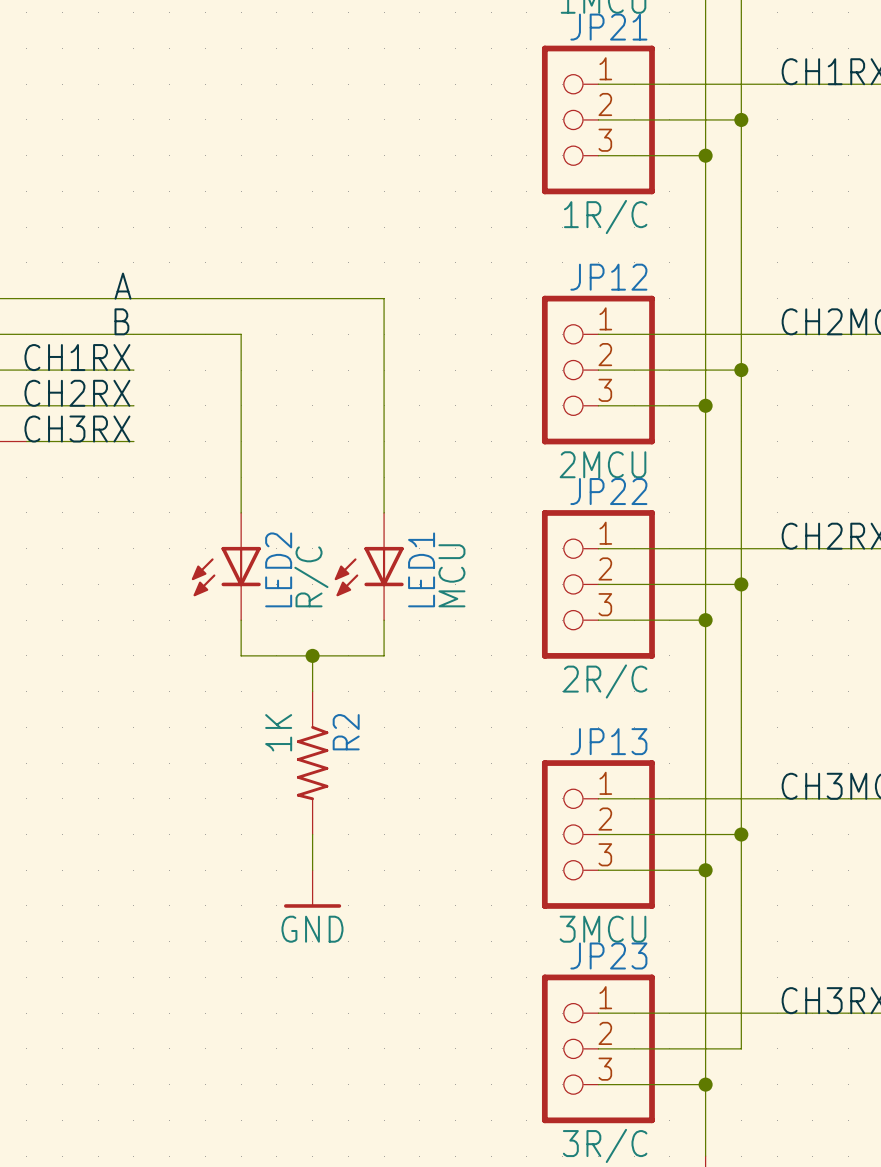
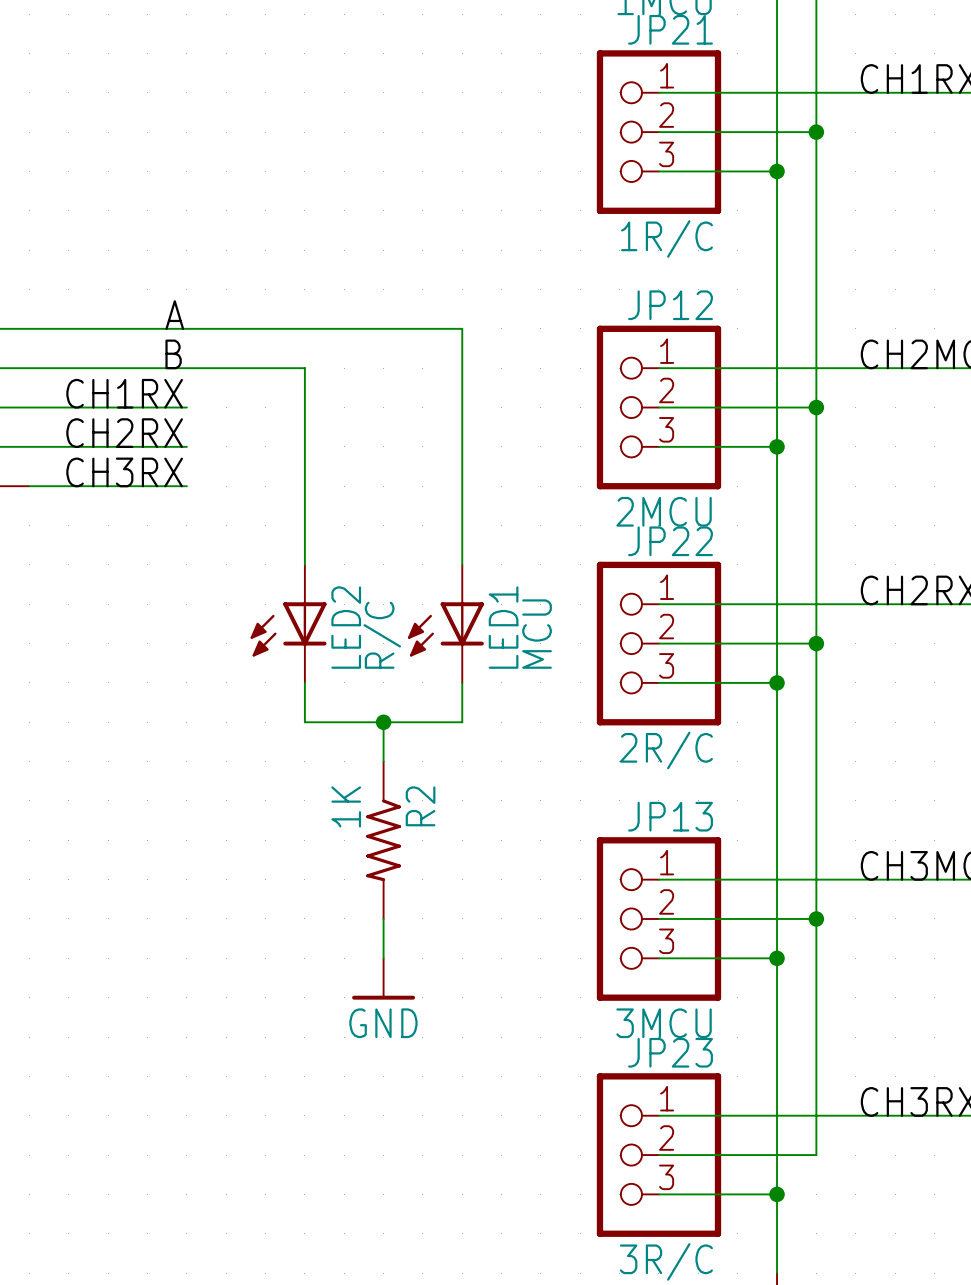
label position: A (122, 286) -> A (174, 315)
wire: (384, 298) (384, 512) -> (422, 328) (462, 328) (462, 564)
label position: B (121, 321) -> B (173, 354)
wire: (241, 334) (241, 512) -> (265, 368) (304, 368) (304, 564)
label position: CH1RX (77, 357) -> CH1RX (124, 393)
wire: none -> (147, 407) (186, 407)
label position: CH2RX (77, 393) -> CH2RX (124, 433)
wire: none -> (147, 446) (186, 446)
label position: CH3RX (77, 429) -> CH3RX (124, 472)
wire: none -> (147, 486) (186, 486)
LED2 position: (226, 566) -> (288, 623)
LED1 position: (369, 566) -> (445, 623)
wire: (241, 620) (241, 655) (276, 655) -> (304, 682) (304, 722)
wire: (384, 620) (384, 655) -> (462, 682) (462, 722) (422, 722)
wire: (312, 655) (312, 691) -> (383, 722) (383, 761)
junction position: (312, 655) -> (383, 722)
R2 position: (312, 763) -> (383, 840)
wire: (312, 834) (312, 870) -> (383, 918) (383, 958)
power symbol position: GND (312, 889) -> GND (383, 978)

